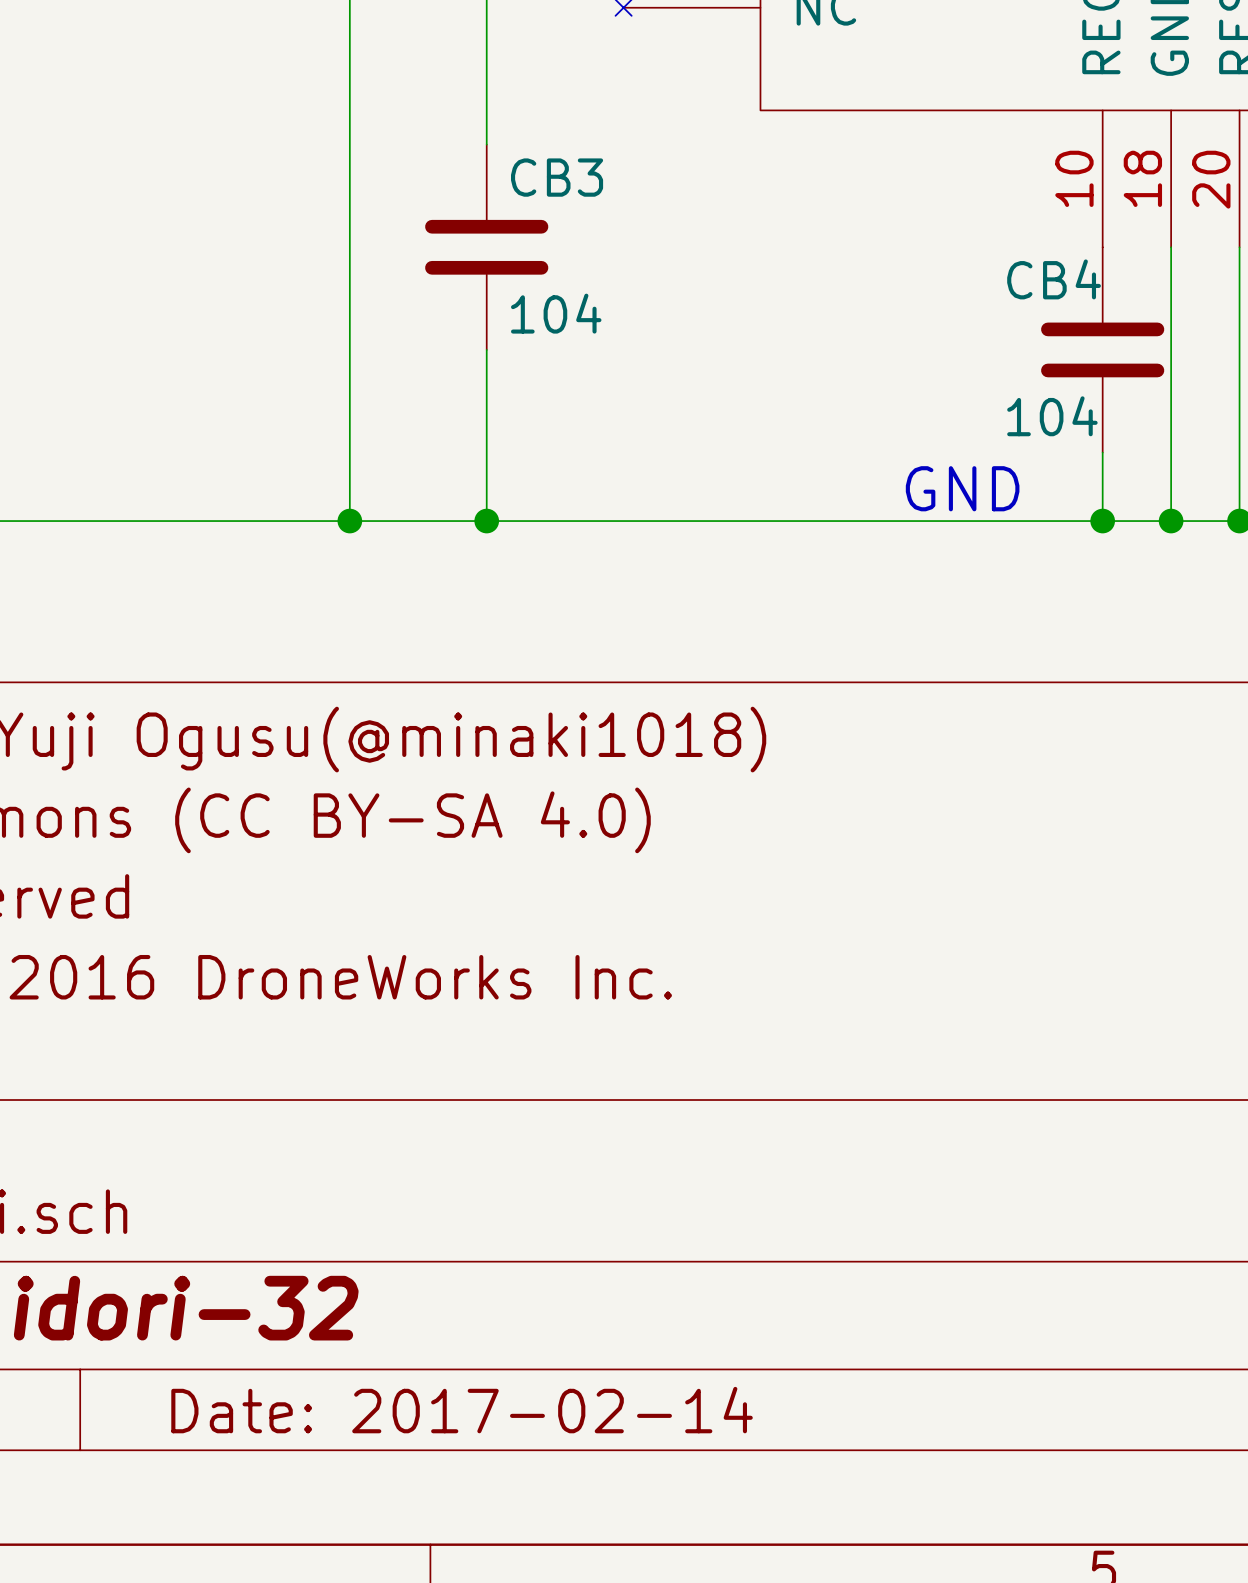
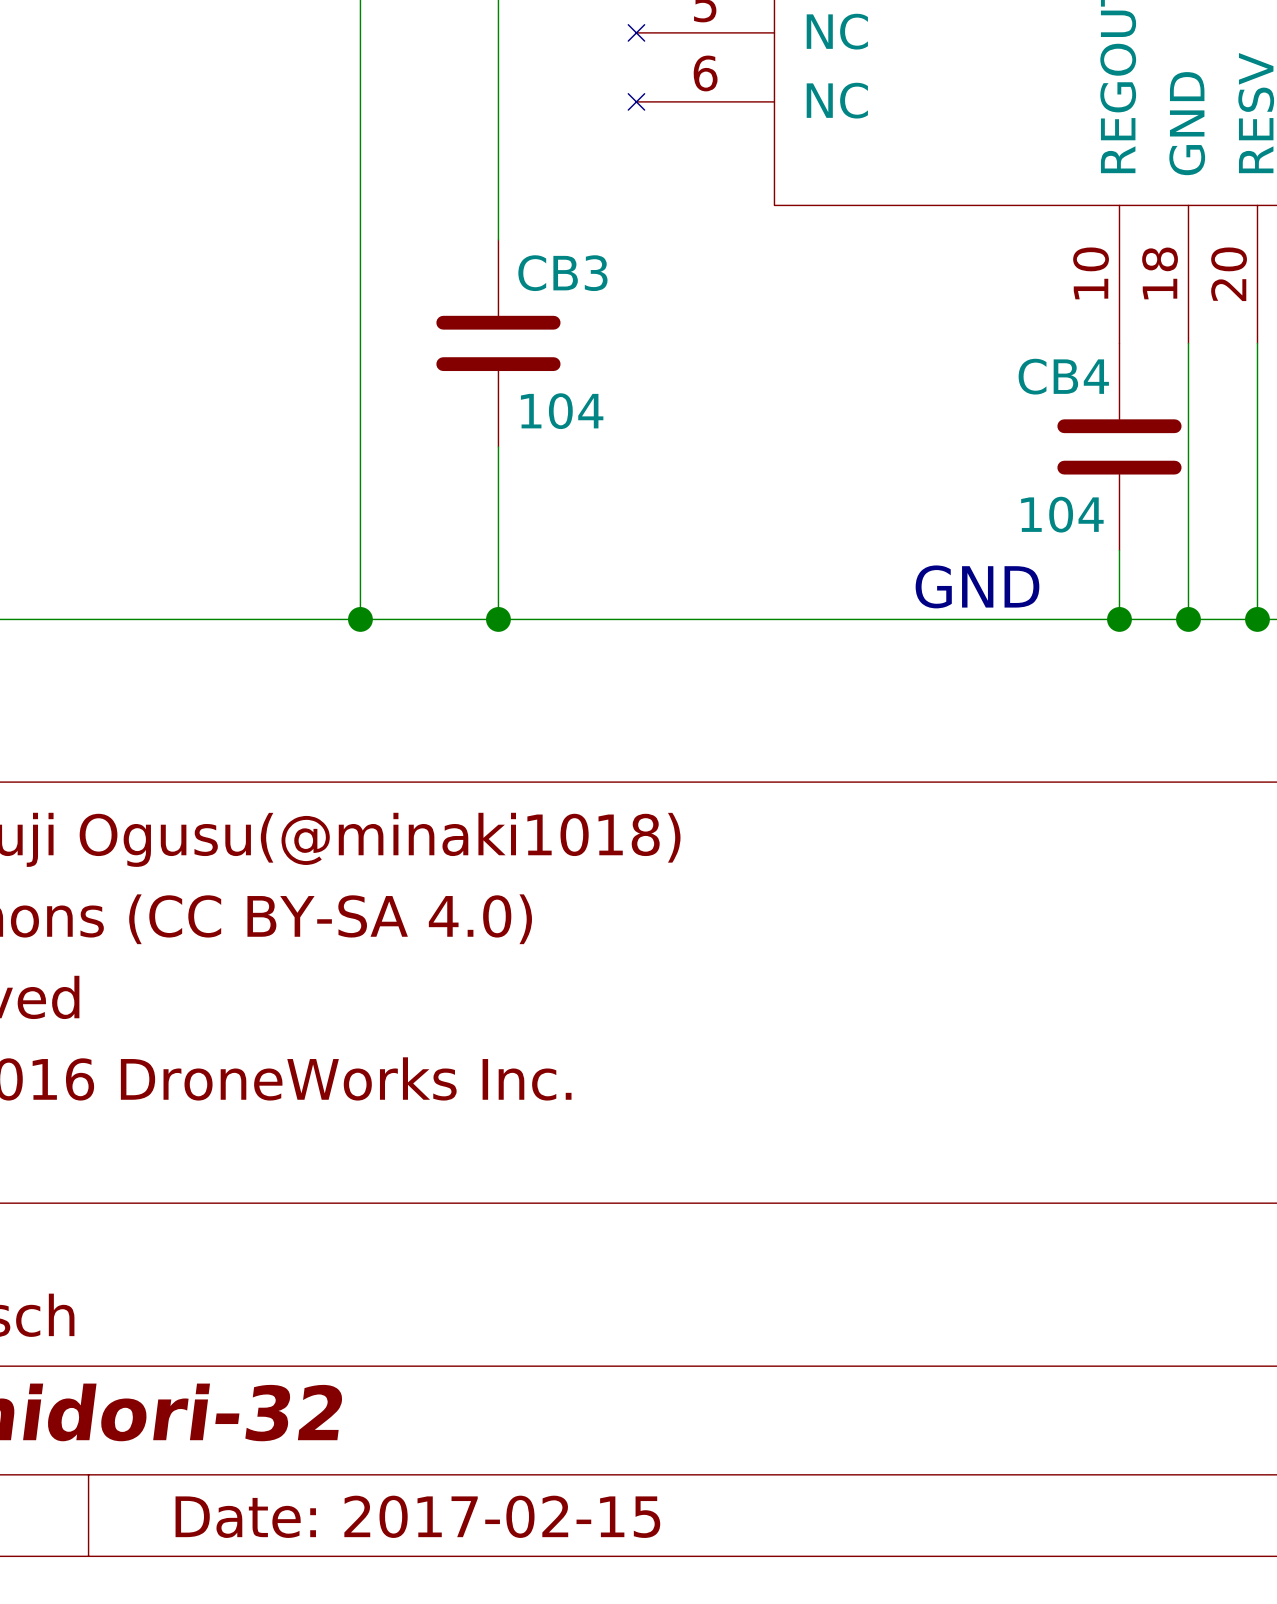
title block: Date: 2017-02-14 (462, 1410) -> Date: 2017-02-15 (417, 1516)

